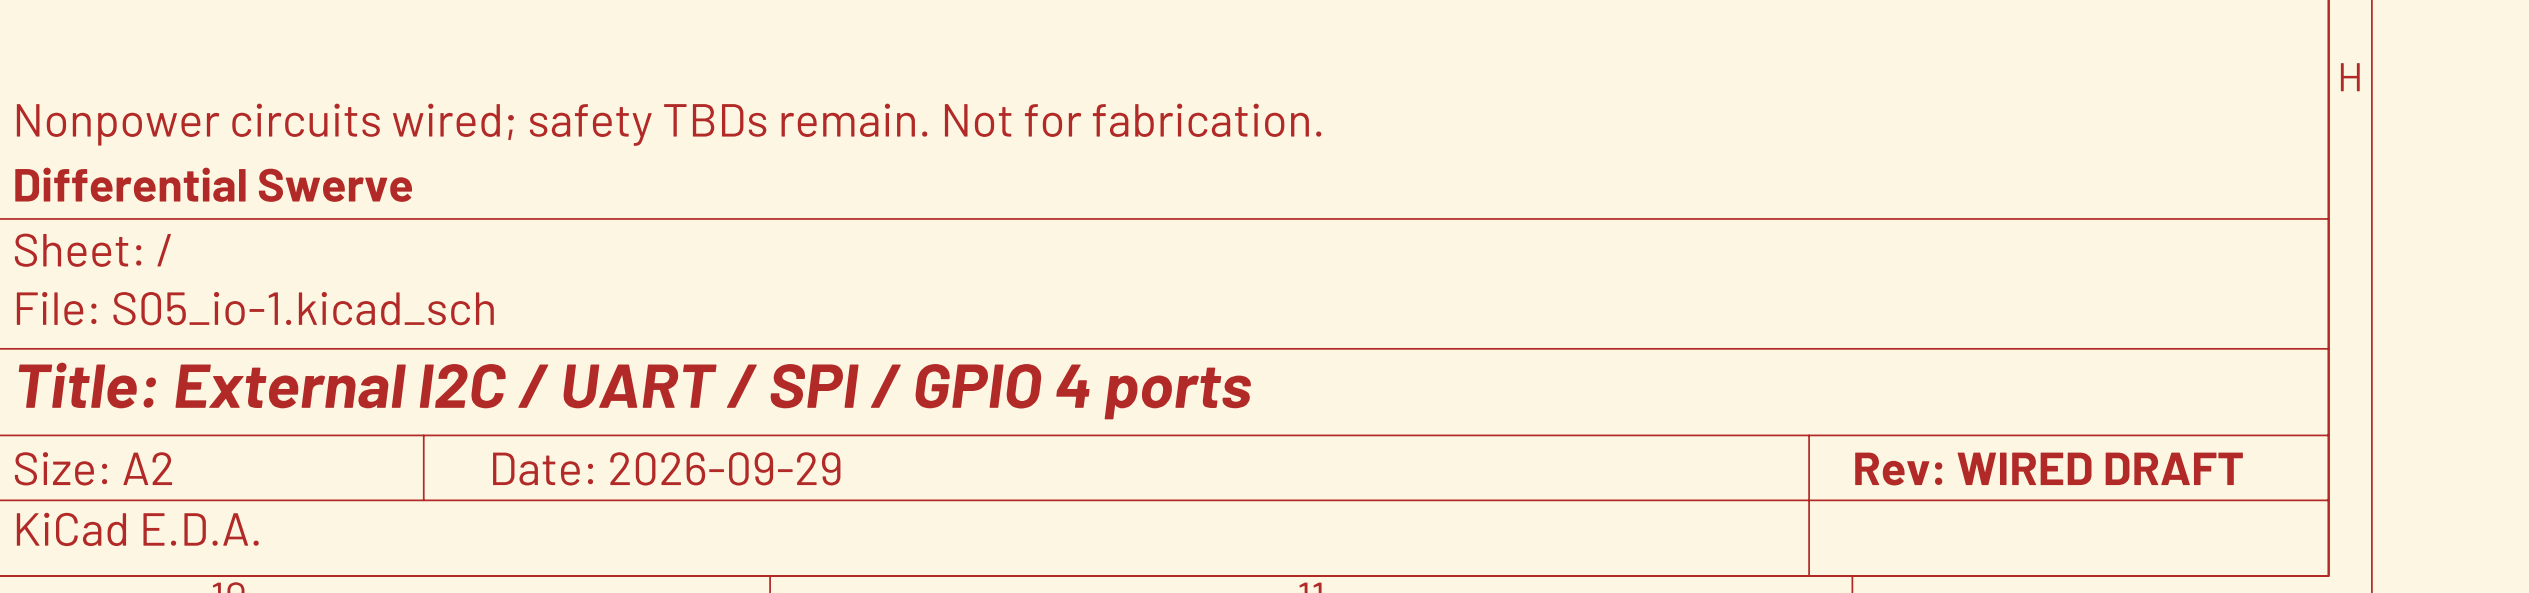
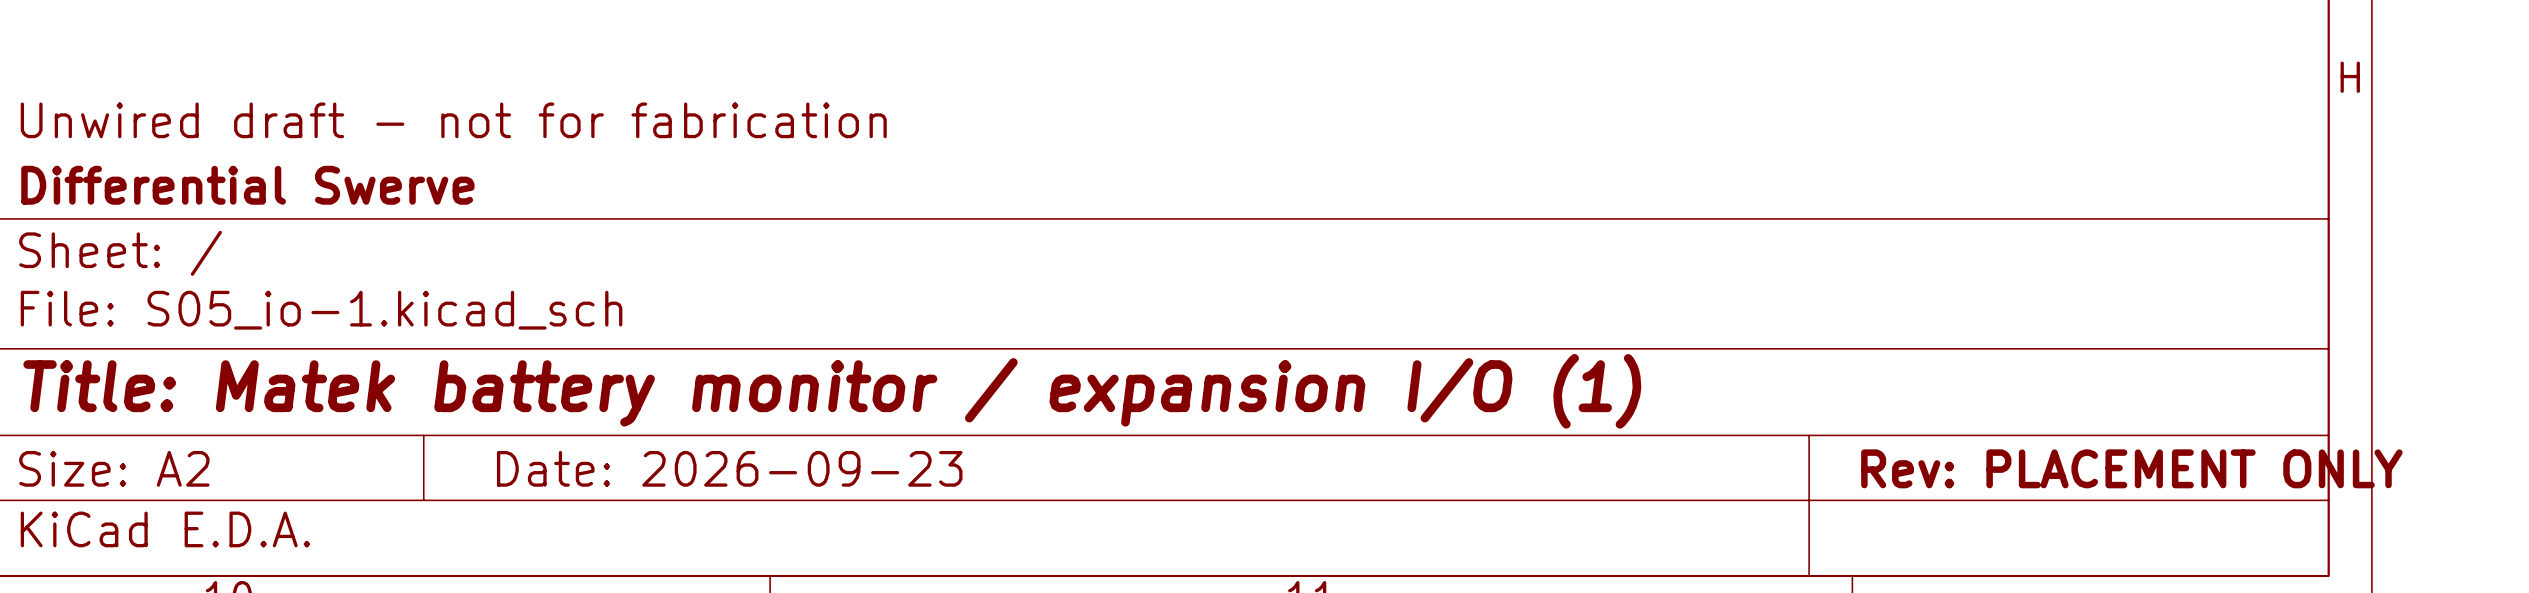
title block: Nonpower circuits wired; safety TBDs remain. Not for fabrication. (669, 124) -> Unwired draft - not for fabrication (453, 120)
title block: Title: External I2C / UART / SPI / GPIO 4 ports (634, 391) -> Title: Matek battery monitor / expansion I/O (1) (832, 391)
title block: Date: 2026-09-29 (666, 468) -> Date: 2026-09-23 (729, 468)
title block: Rev: WIRED DRAFT (2049, 469) -> Rev: PLACEMENT ONLY (2131, 468)

